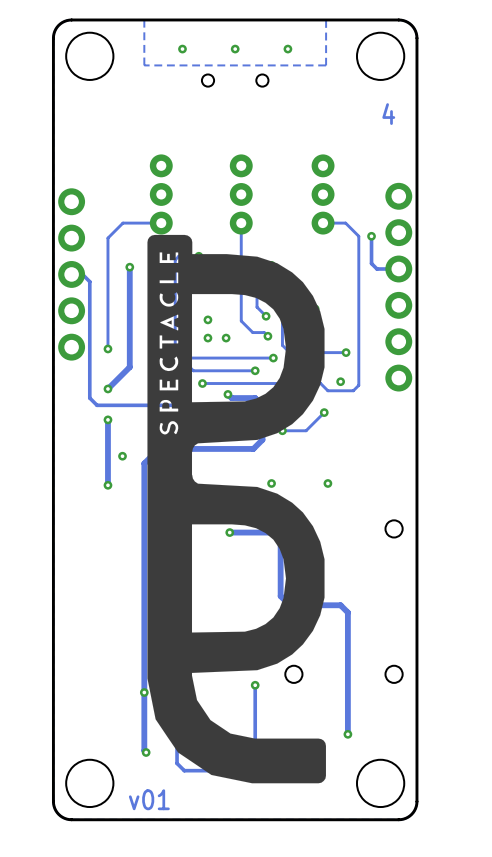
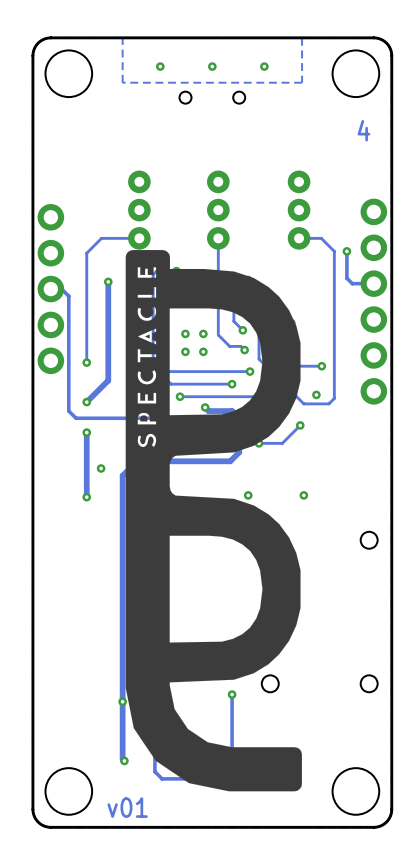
via: none -> (203, 333)
track: (229, 532) (271, 532) (280, 541) (280, 596) (289, 605) (340, 605) (347, 612) (347, 734) -> none
via: (229, 532) -> none
via: (347, 734) -> none

